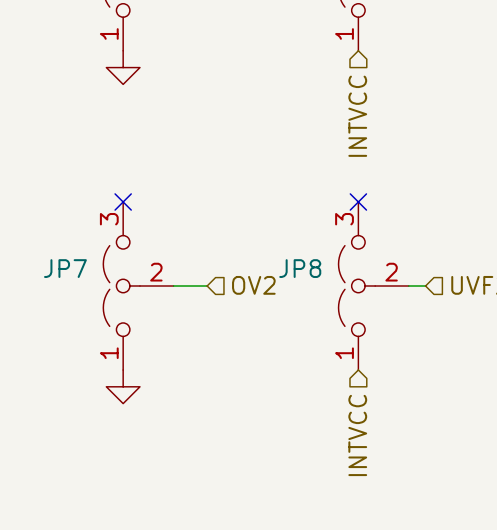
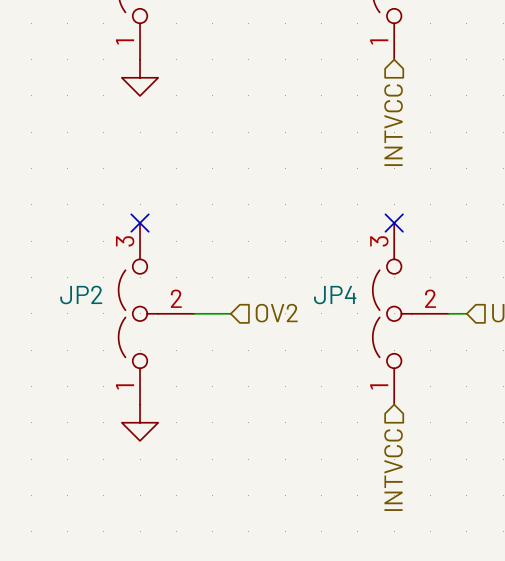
JP7 name: JP7 (65, 268) -> JP2 (81, 294)
JP8 name: JP8 (300, 268) -> JP4 (335, 295)

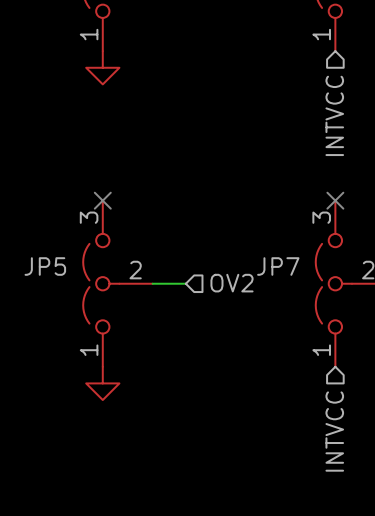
JP2 name: JP2 (81, 294) -> JP5 (45, 266)
JP4 name: JP4 (335, 295) -> JP7 (278, 266)

